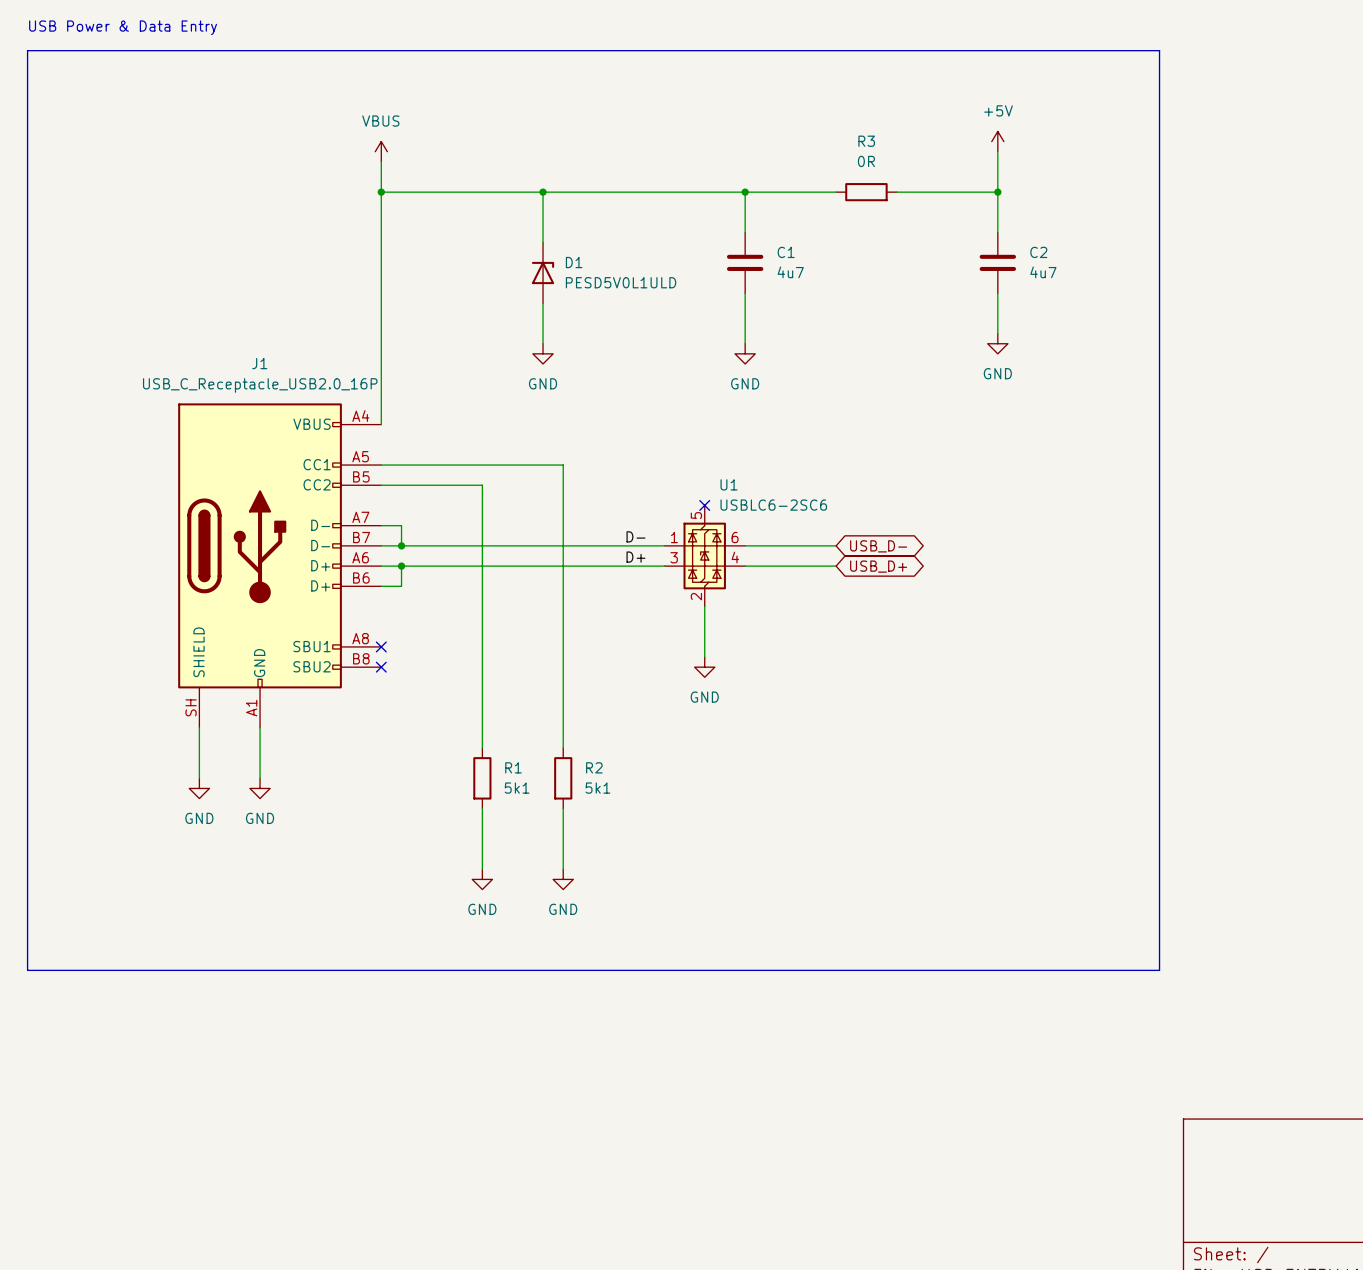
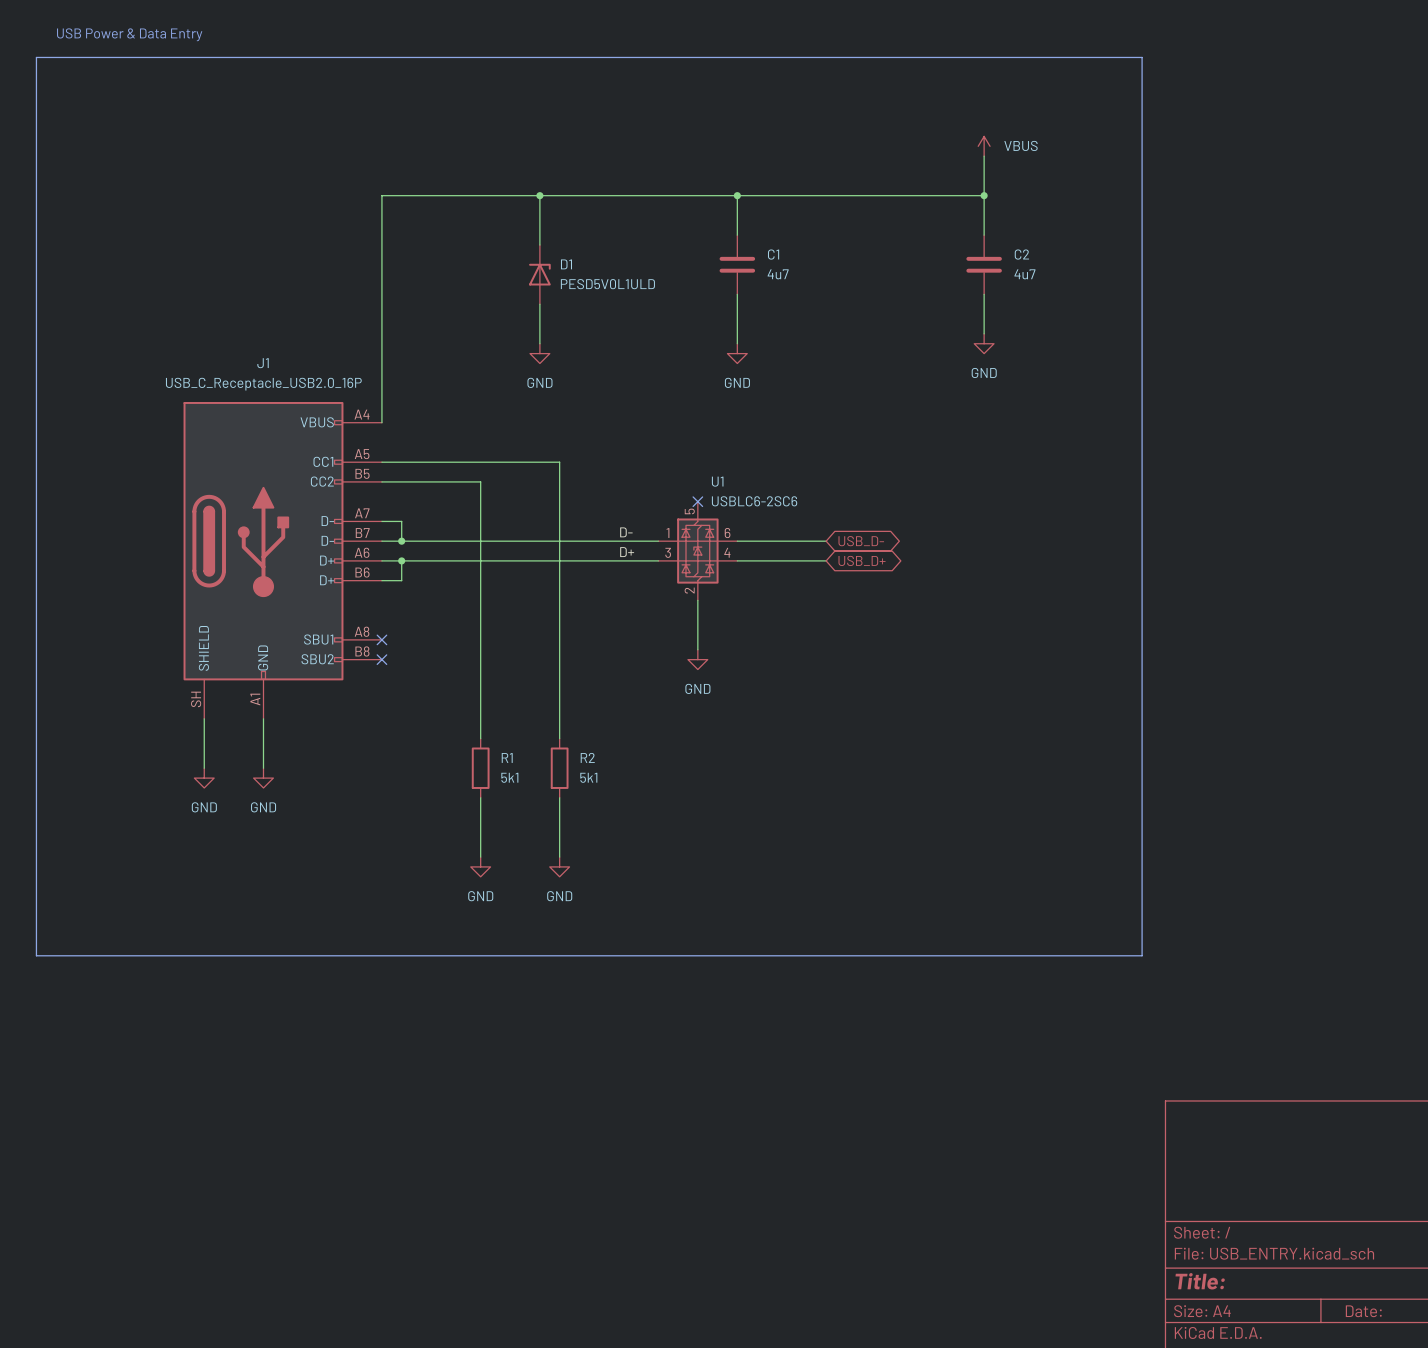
power symbol: +5V (997, 141) -> VBUS (984, 146)
power symbol: VBUS (381, 151) -> none
wire: (381, 161) (381, 192) -> none
junction: (381, 192) -> none
wire: none -> (826, 195) (885, 195)
R3: 0R (866, 192) -> none

